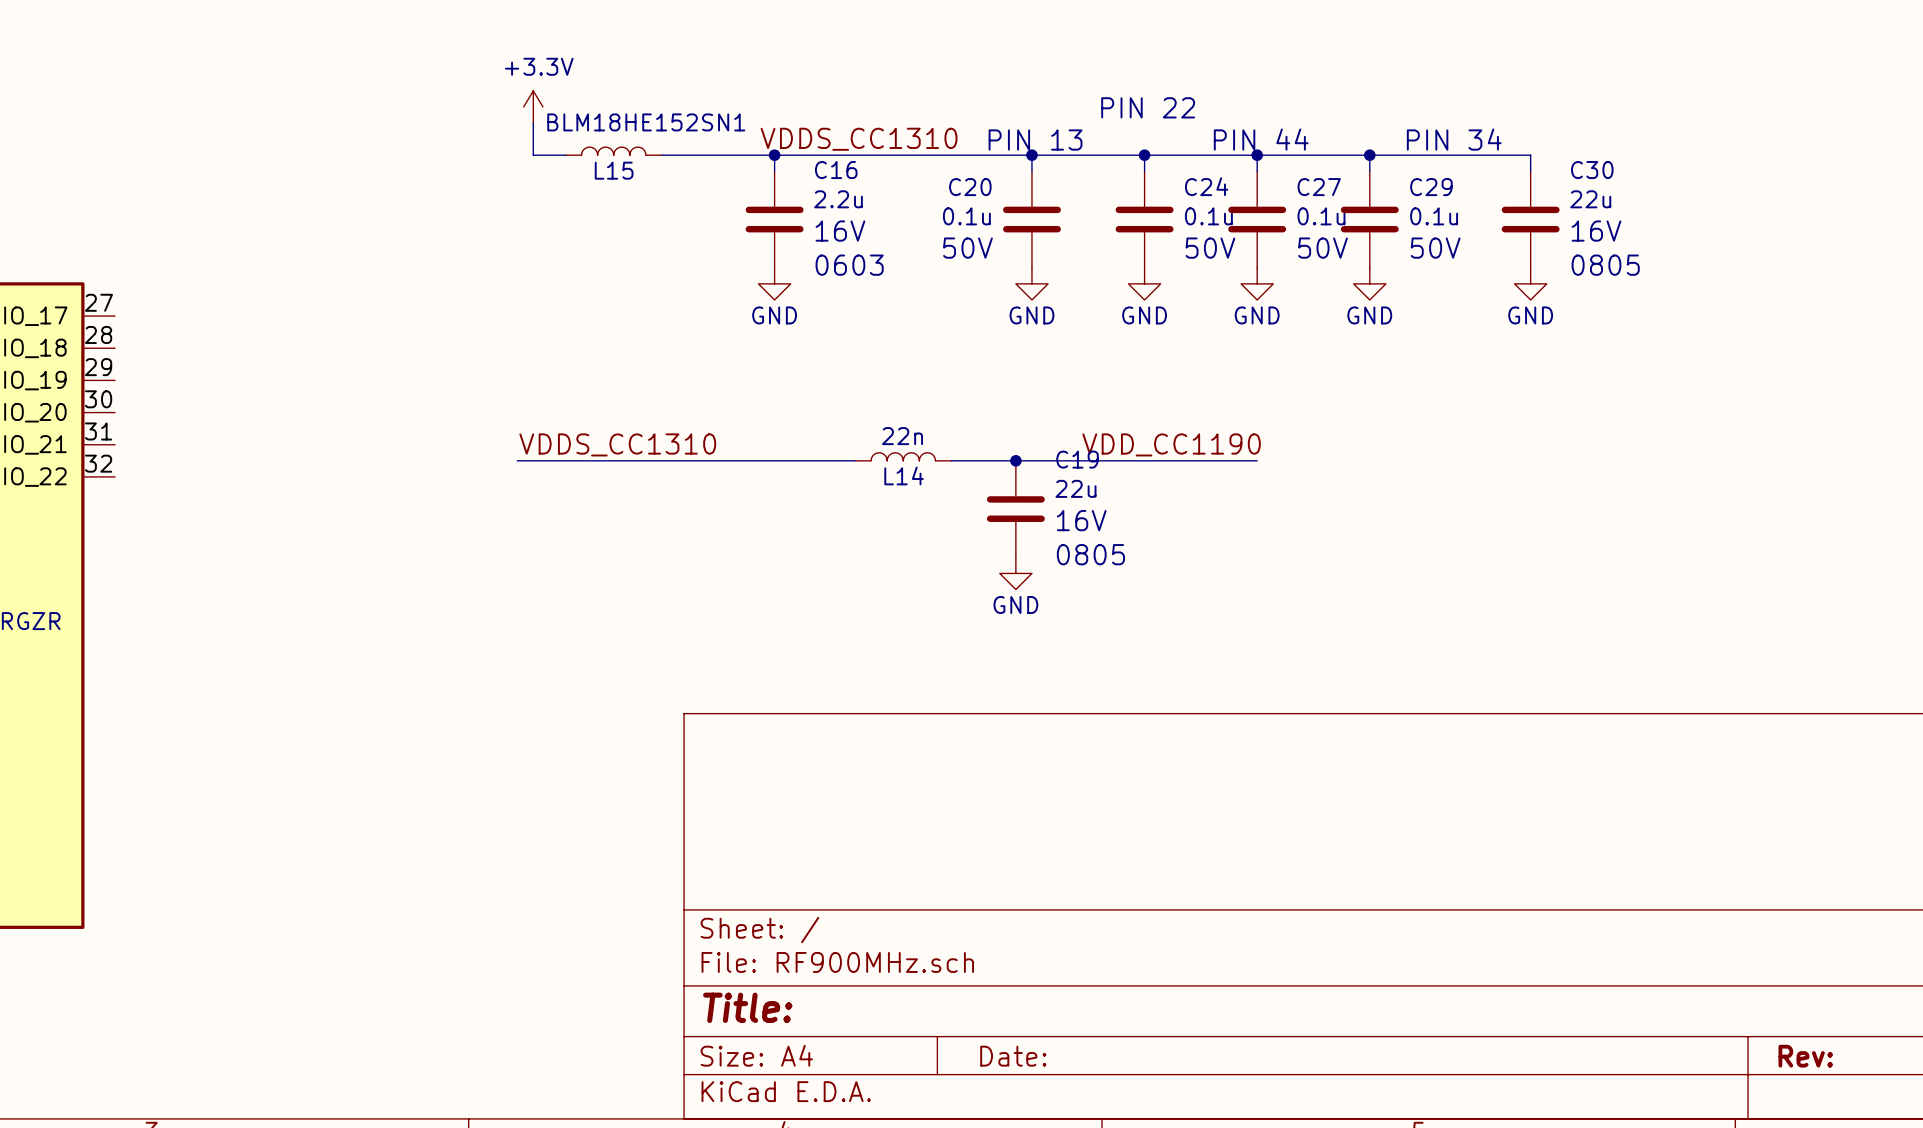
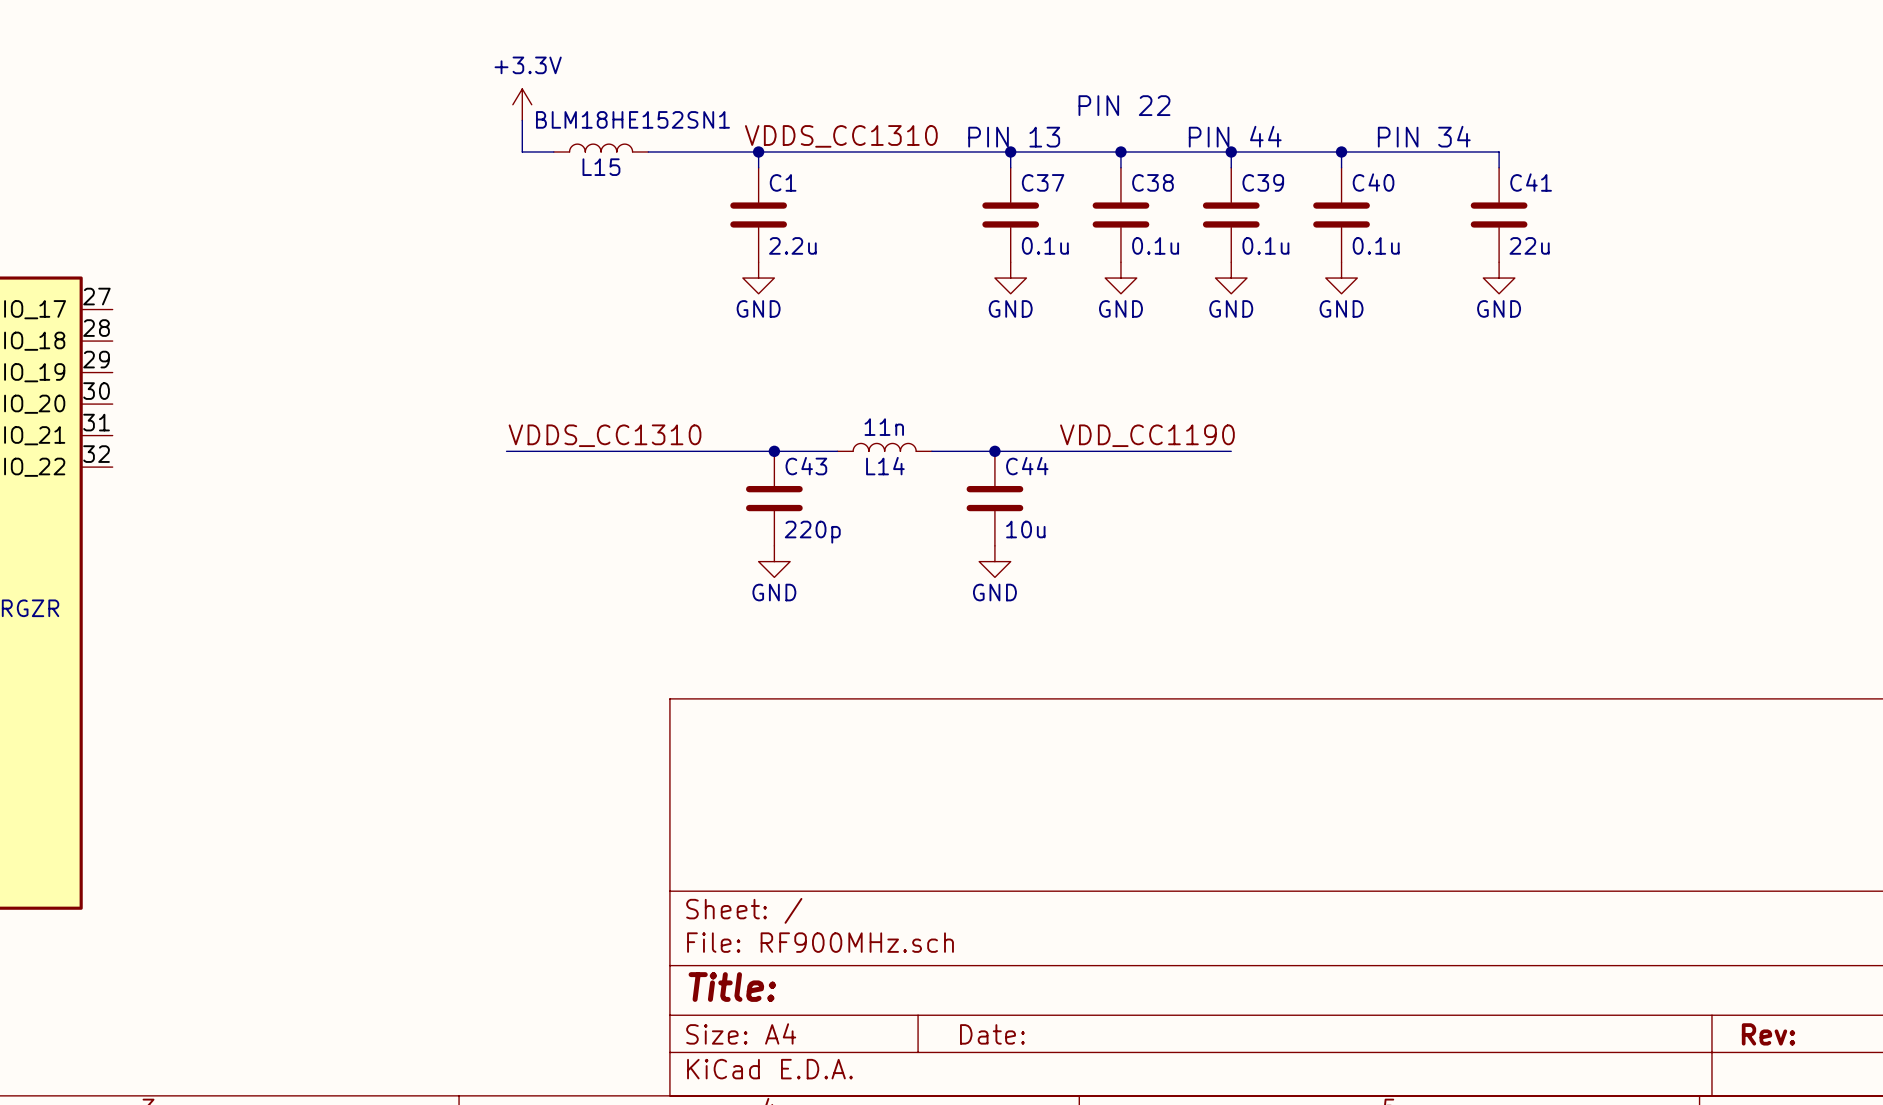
C16 name: C16 (836, 170) -> C1 (783, 182)
C30 name: C30 (1592, 170) -> C41 (1531, 182)
C24 name: C24 (1206, 186) -> C38 (1152, 182)
C20 name: C20 (970, 187) -> C37 (1043, 182)
C27 name: C27 (1319, 187) -> C39 (1263, 182)
C29 name: C29 (1431, 187) -> C40 (1373, 182)
C16 value position: 2.2u (838, 199) -> 2.2u (792, 245)
C30 value position: 22u (1590, 199) -> 22u (1529, 245)
C20 value position: 0.1u (966, 216) -> 0.1u (1045, 245)
C24 value position: 0.1u (1208, 216) -> 0.1u (1155, 245)
C27 value position: 0.1u (1321, 216) -> 0.1u (1265, 245)
C29 value position: 0.1u (1434, 216) -> 0.1u (1376, 245)
C16 text: 16V (840, 231) -> none
C30 text: 16V (1596, 231) -> none
C20 text: 50V (967, 248) -> none
C24 text: 50V (1210, 248) -> none
C27 text: 50V (1323, 248) -> none
C29 text: 50V (1435, 248) -> none
C16 text: 0603 (849, 265) -> none
C30 text: 0805 (1605, 265) -> none
L14 value: 22n (902, 436) -> 11n (884, 427)
C19 name: C19 (1077, 459) -> C44 (1027, 466)
junction: none -> (774, 451)
C19 value: 22u (1075, 488) -> 10u (1025, 529)
C43: none -> 220p (774, 498)
C19 text: 16V (1081, 520) -> none
C19 text: 0805 (1090, 554) -> none
power symbol: none -> GND (774, 561)

